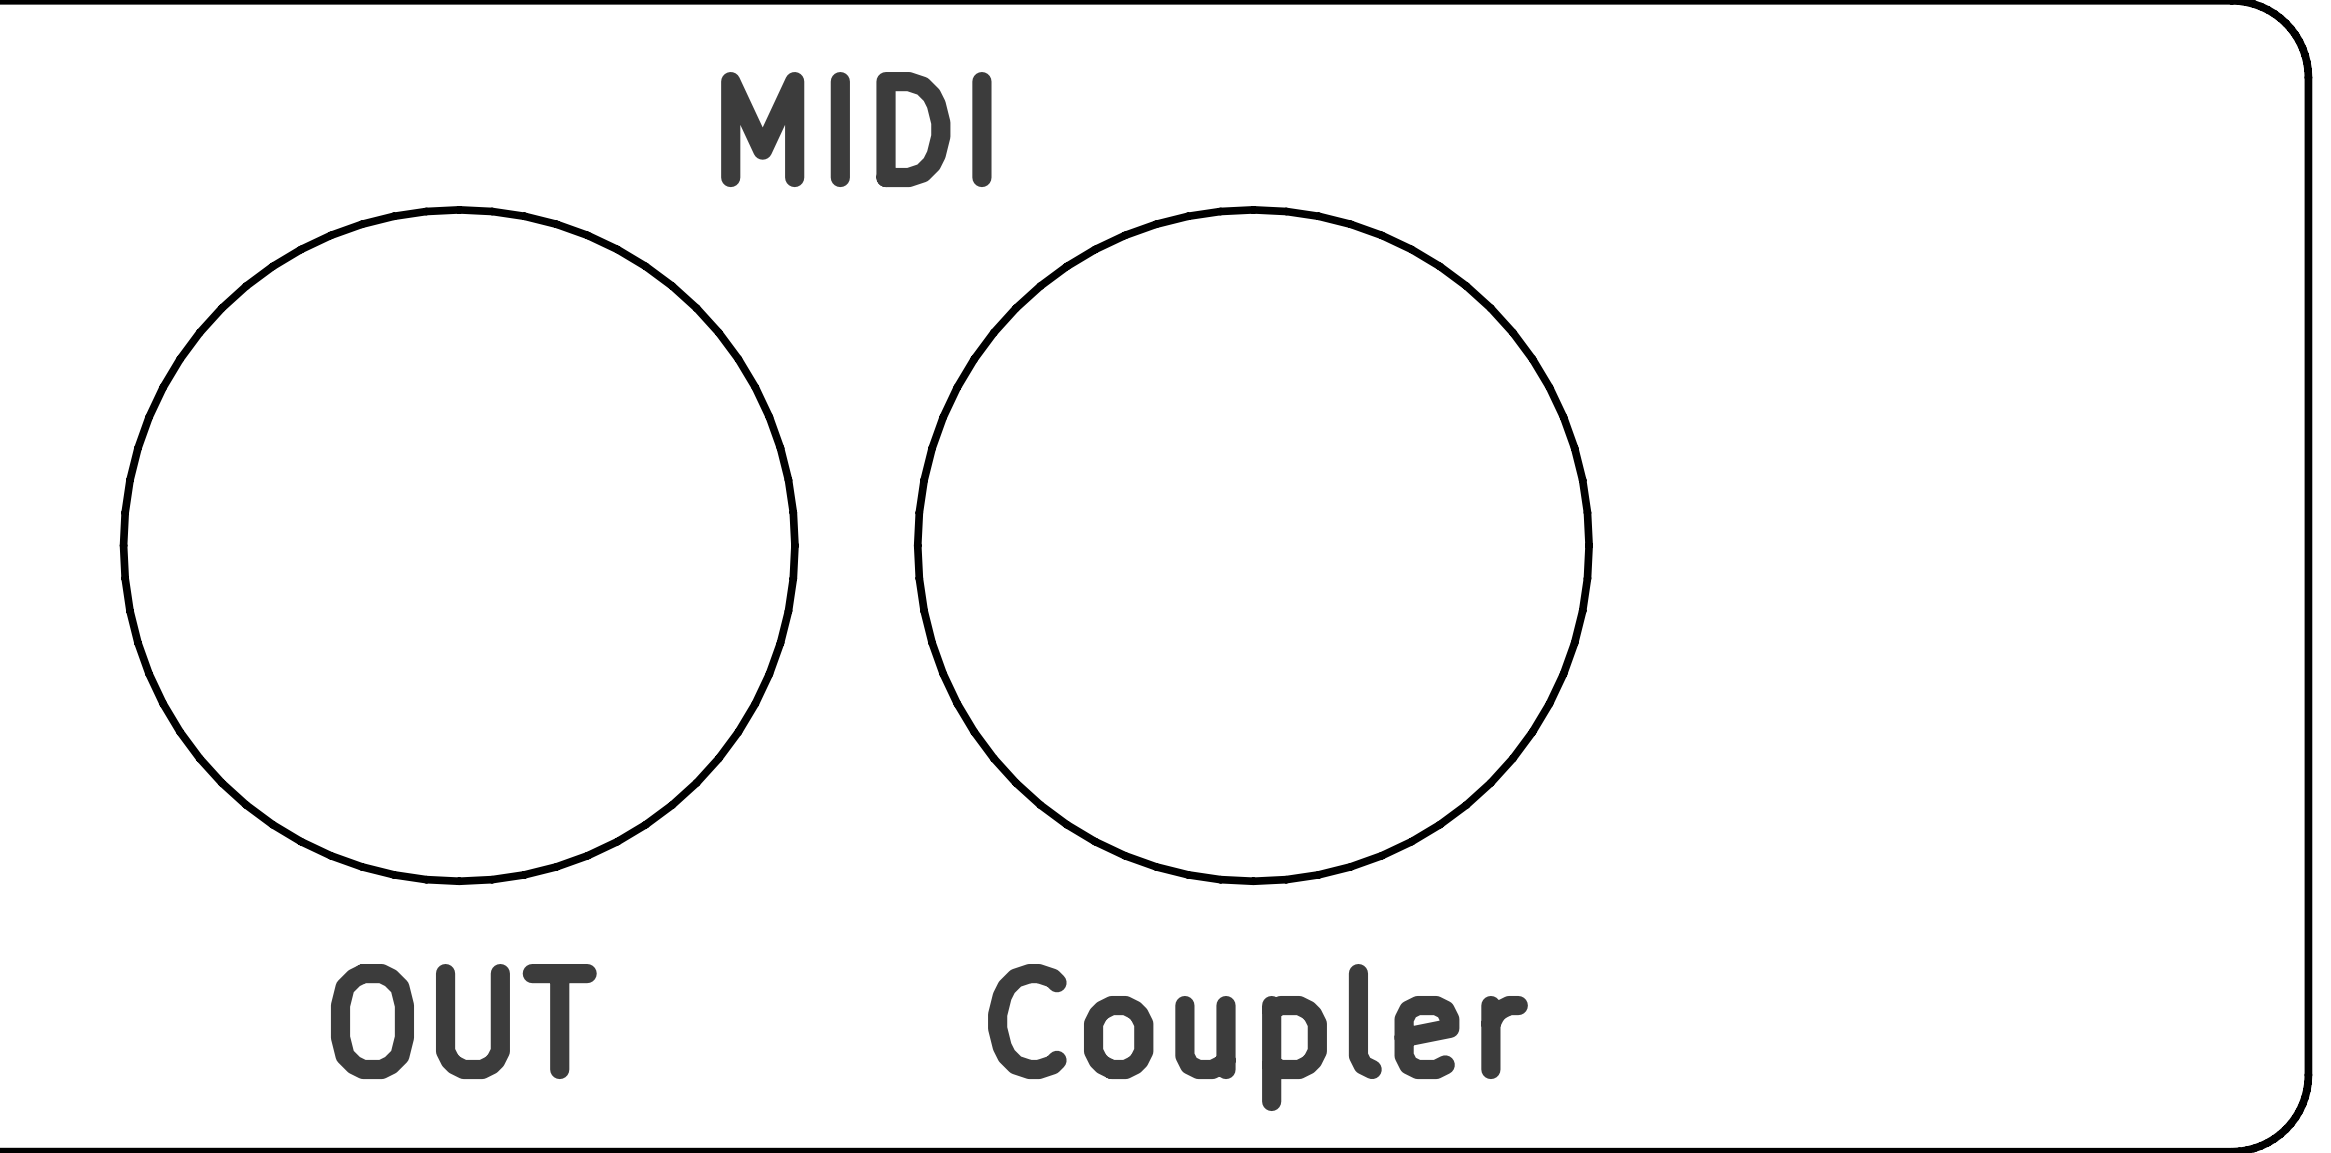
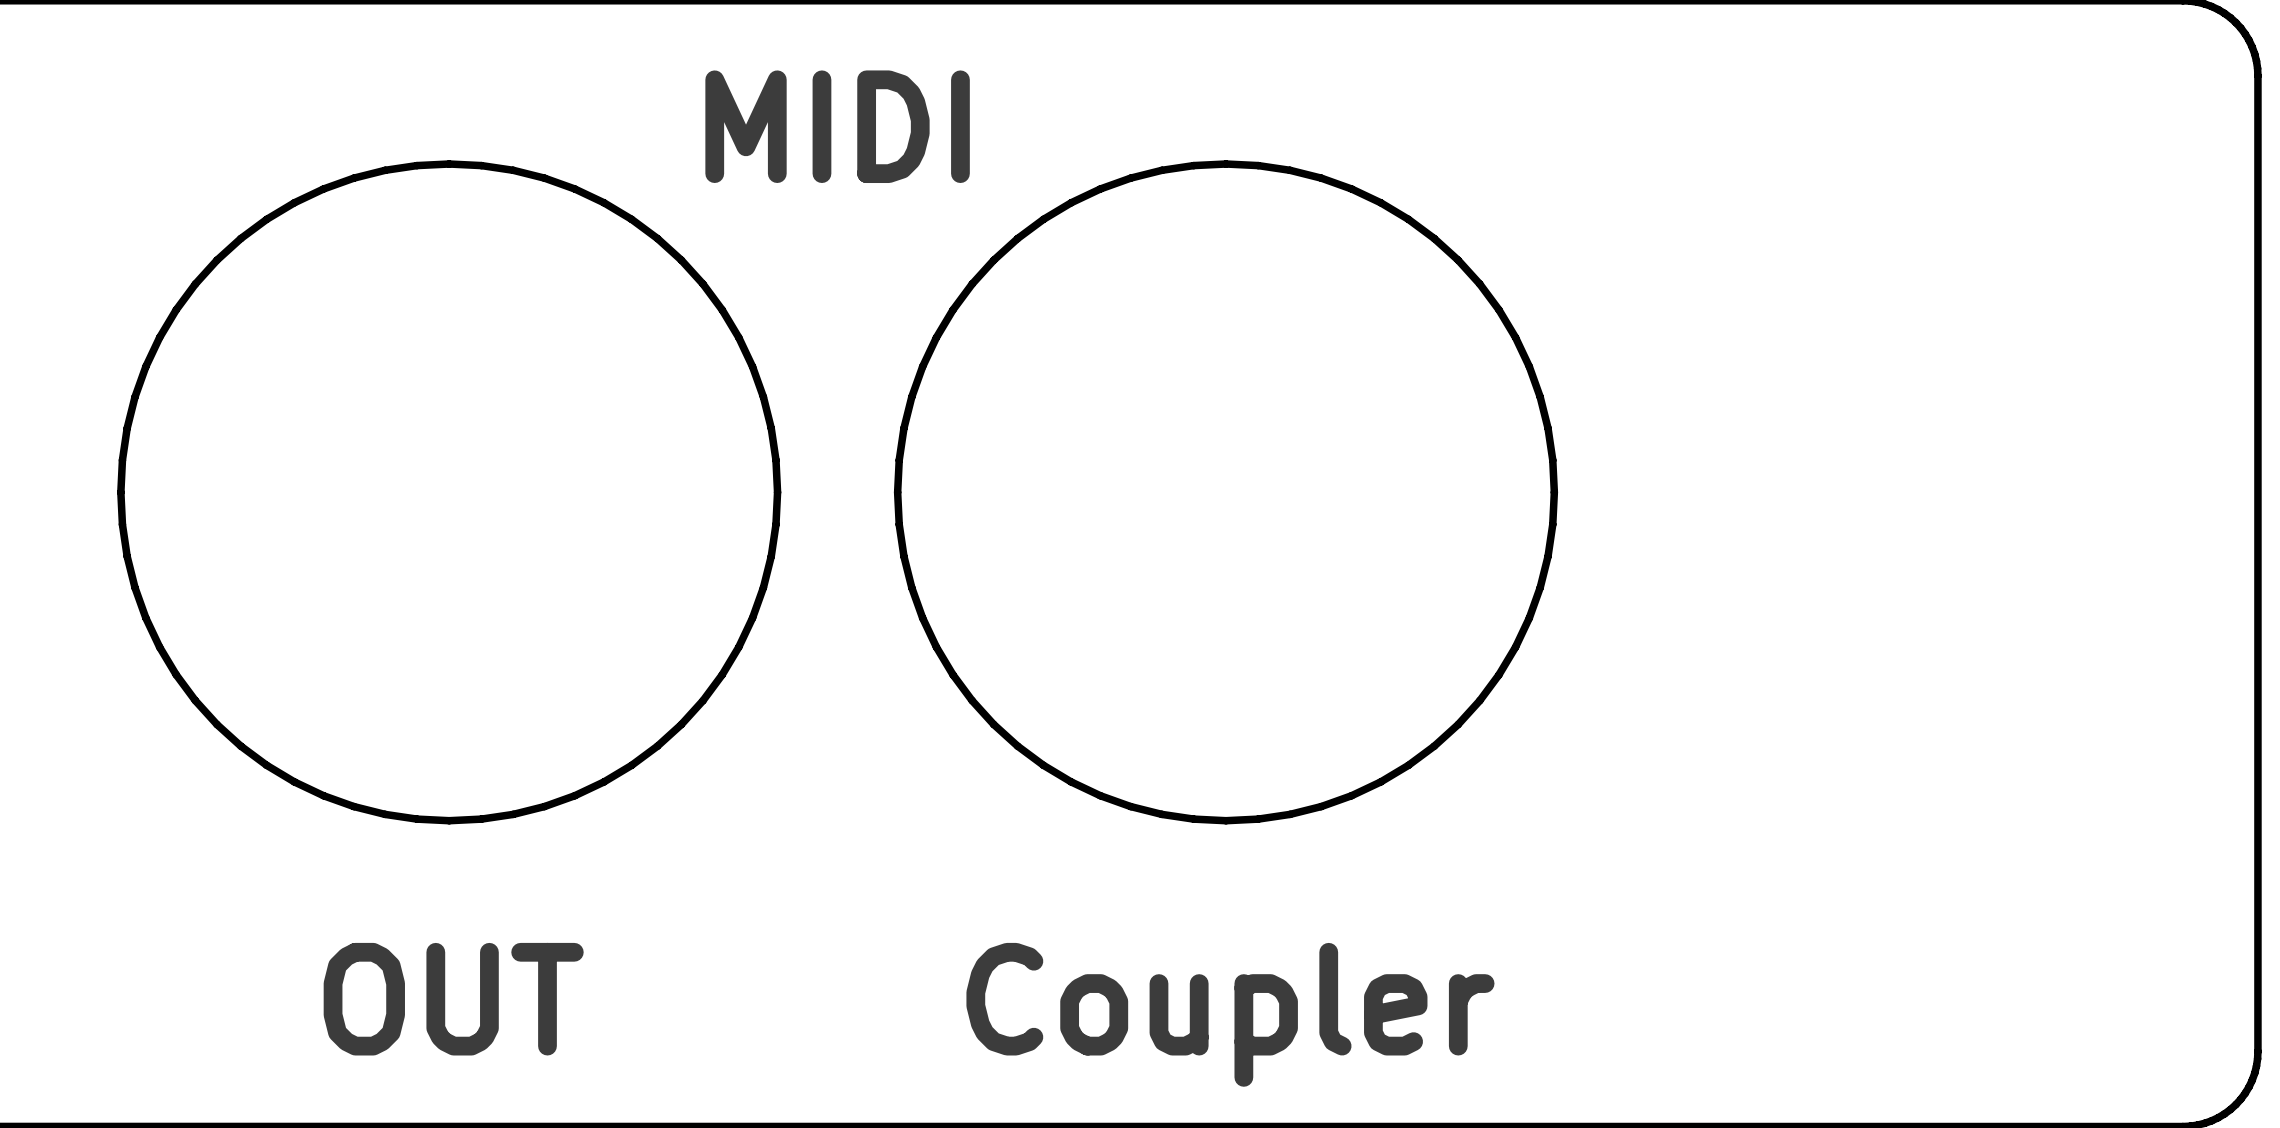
board edge: (459, 209) (492, 211) (524, 216) (556, 224) (587, 235) (617, 249) (645, 266) (672, 286) (696, 308) (718, 332) (738, 359) (755, 387) (769, 417) (780, 448) (788, 480) (793, 512) (794, 545) (793, 578) (788, 611) (780, 643) (769, 674) (755, 703) (738, 732) (718, 758) (696, 782) (672, 805) (645, 824) (617, 841) (587, 855) (556, 866) (524, 874) (492, 879) (459, 881) (426, 879) (393, 874) (361, 866) (330, 855) (301, 841) (272, 824) (246, 805) (221, 782) (199, 758) (180, 732) (163, 703) (149, 674) (138, 643) (130, 611) (125, 578) (123, 545) (125, 512) (130, 480) (138, 448) (149, 417) (163, 387) (180, 359) (199, 332) (221, 308) (246, 286) (272, 266) (301, 249) (330, 235) (361, 224) (393, 216) (426, 211) (459, 209) -> (449, 164) (481, 165) (513, 170) (544, 178) (574, 189) (603, 202) (631, 219) (657, 238) (681, 260) (703, 284) (722, 309) (738, 337) (752, 366) (763, 397) (771, 428) (775, 460) (777, 492) (775, 524) (771, 556) (763, 587) (752, 618) (738, 647) (722, 674) (703, 700) (681, 724) (657, 746) (631, 765) (603, 781) (574, 795) (544, 806) (513, 814) (481, 819) (449, 820) (417, 819) (385, 814) (353, 806) (323, 795) (294, 781) (266, 765) (240, 746) (217, 724) (195, 700) (176, 674) (159, 647) (145, 618) (135, 587) (127, 556) (122, 524) (120, 492) (122, 460) (127, 428) (135, 397) (145, 366) (159, 337) (176, 309) (195, 284) (217, 260) (240, 238) (266, 219) (294, 202) (323, 189) (353, 178) (385, 170) (417, 165) (449, 164)
board edge: (1253, 209) (1286, 211) (1318, 216) (1350, 224) (1381, 235) (1411, 249) (1439, 266) (1466, 286) (1490, 308) (1512, 332) (1532, 359) (1549, 387) (1563, 417) (1574, 448) (1582, 480) (1587, 512) (1589, 545) (1587, 578) (1582, 611) (1574, 643) (1563, 674) (1549, 703) (1532, 732) (1512, 758) (1490, 782) (1466, 805) (1439, 824) (1411, 841) (1381, 855) (1350, 866) (1318, 874) (1286, 879) (1253, 881) (1220, 879) (1187, 874) (1155, 866) (1124, 855) (1095, 841) (1066, 824) (1040, 805) (1016, 782) (993, 758) (974, 732) (957, 703) (943, 674) (932, 643) (924, 611) (919, 578) (917, 545) (919, 512) (924, 480) (932, 448) (943, 417) (957, 387) (974, 359) (993, 332) (1016, 308) (1040, 286) (1066, 266) (1095, 249) (1124, 235) (1155, 224) (1187, 216) (1220, 211) (1253, 209) -> (1225, 164) (1258, 165) (1290, 170) (1321, 178) (1351, 189) (1380, 202) (1408, 219) (1434, 238) (1458, 260) (1479, 284) (1499, 309) (1515, 337) (1529, 366) (1540, 397) (1548, 428) (1552, 460) (1554, 492) (1552, 524) (1548, 556) (1540, 587) (1529, 618) (1515, 647) (1499, 674) (1479, 700) (1458, 724) (1434, 746) (1408, 765) (1380, 781) (1351, 795) (1321, 806) (1290, 814) (1258, 819) (1225, 820) (1193, 819) (1161, 814) (1130, 806) (1100, 795) (1071, 781) (1043, 765) (1017, 746) (993, 724) (972, 700) (952, 674) (936, 647) (922, 618) (911, 587) (903, 556) (899, 524) (897, 492) (899, 460) (903, 428) (911, 397) (922, 366) (936, 337) (952, 309) (972, 284) (993, 260) (1017, 238) (1043, 219) (1071, 202) (1100, 189) (1130, 178) (1161, 170) (1193, 165) (1225, 164)

